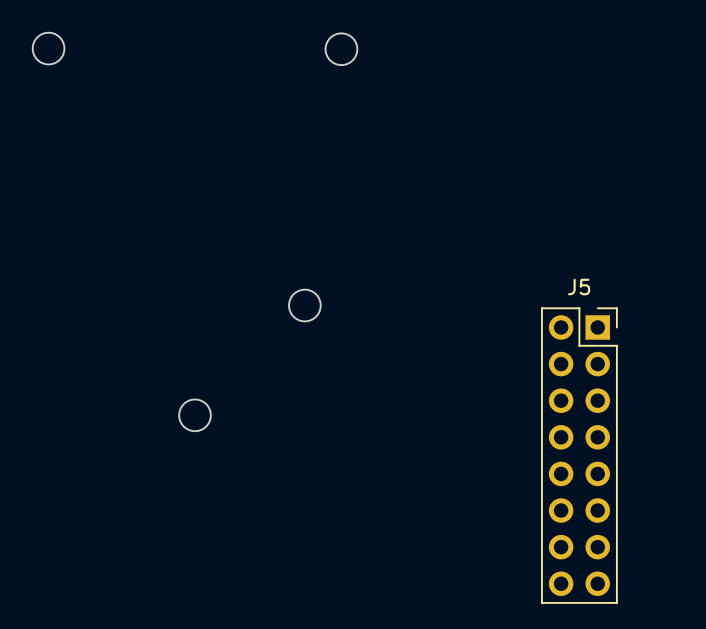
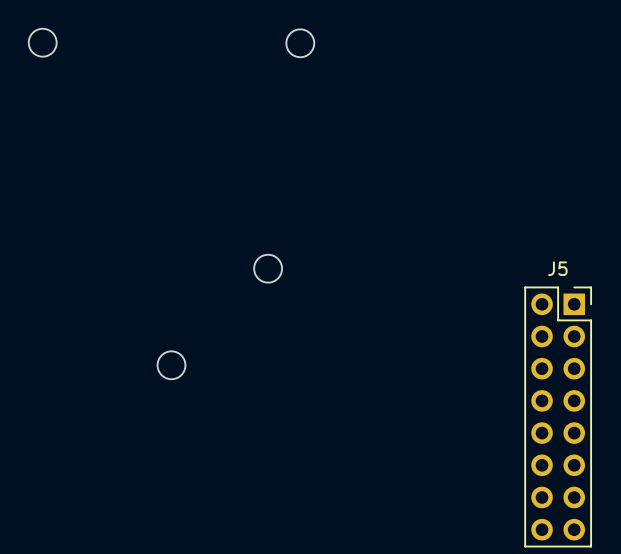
J5 position: (579, 455) -> (558, 416)

